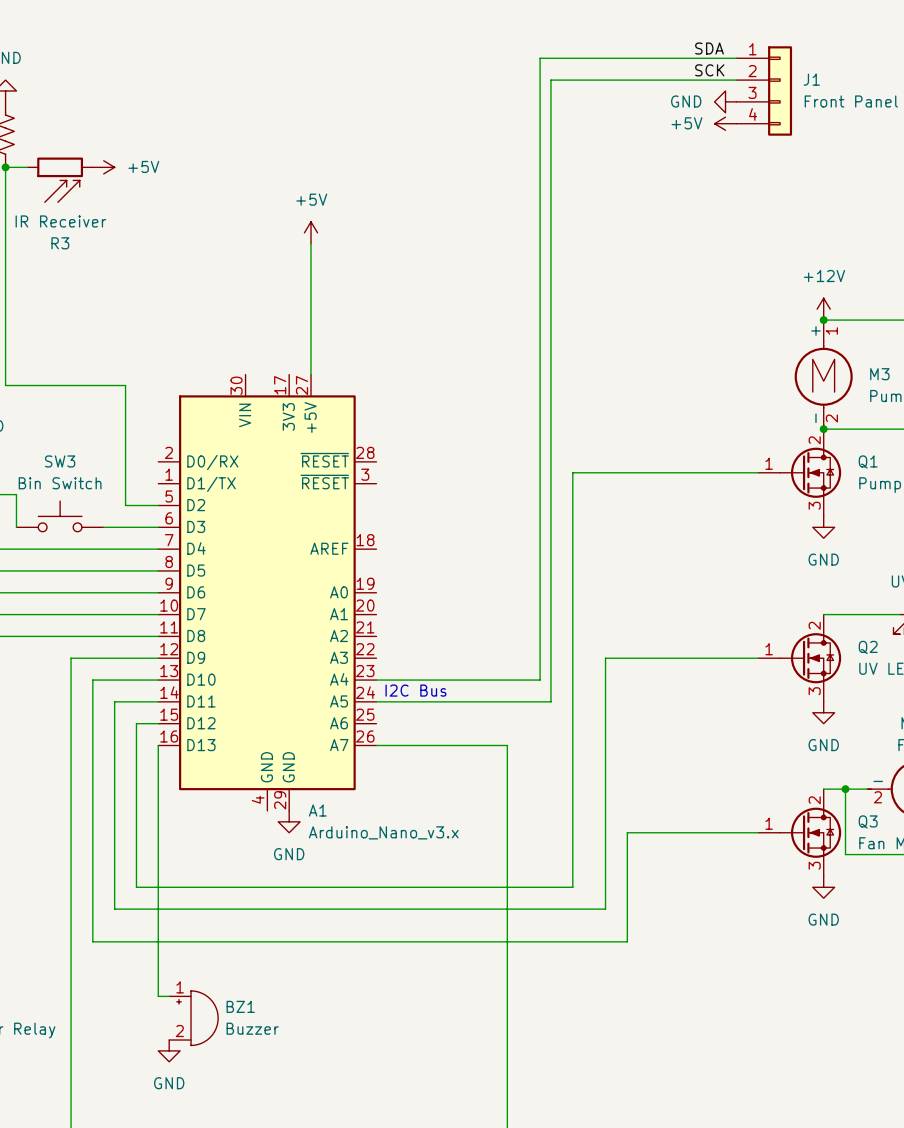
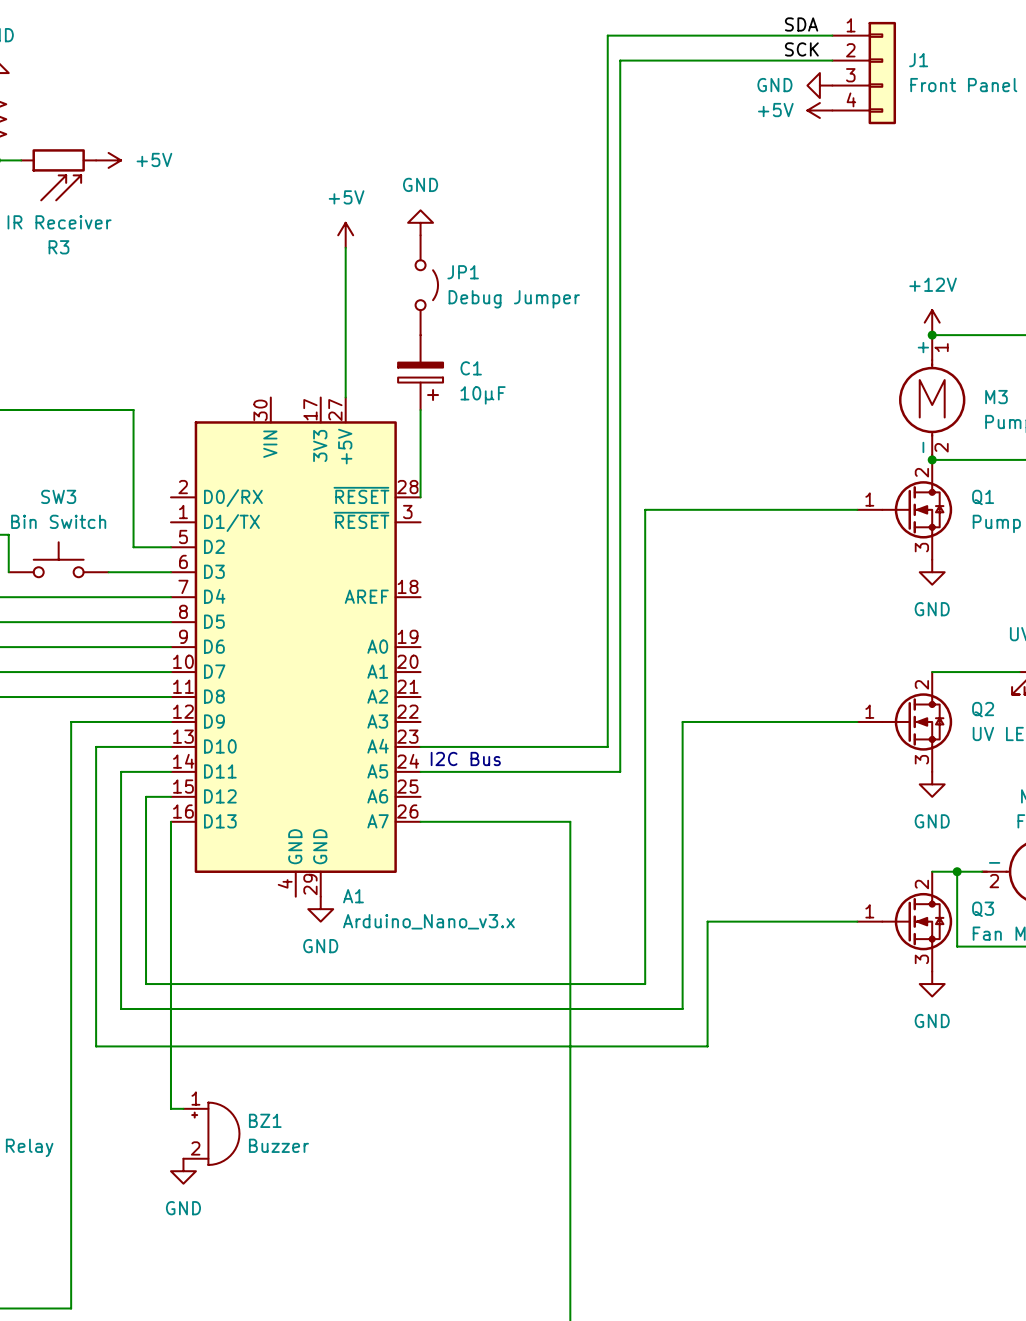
power symbol: none -> GND (420, 222)
JP1: none -> Debug Jumper (426, 285)
C1: none -> 10µF (420, 372)
wire: none -> (420, 410) (420, 497)

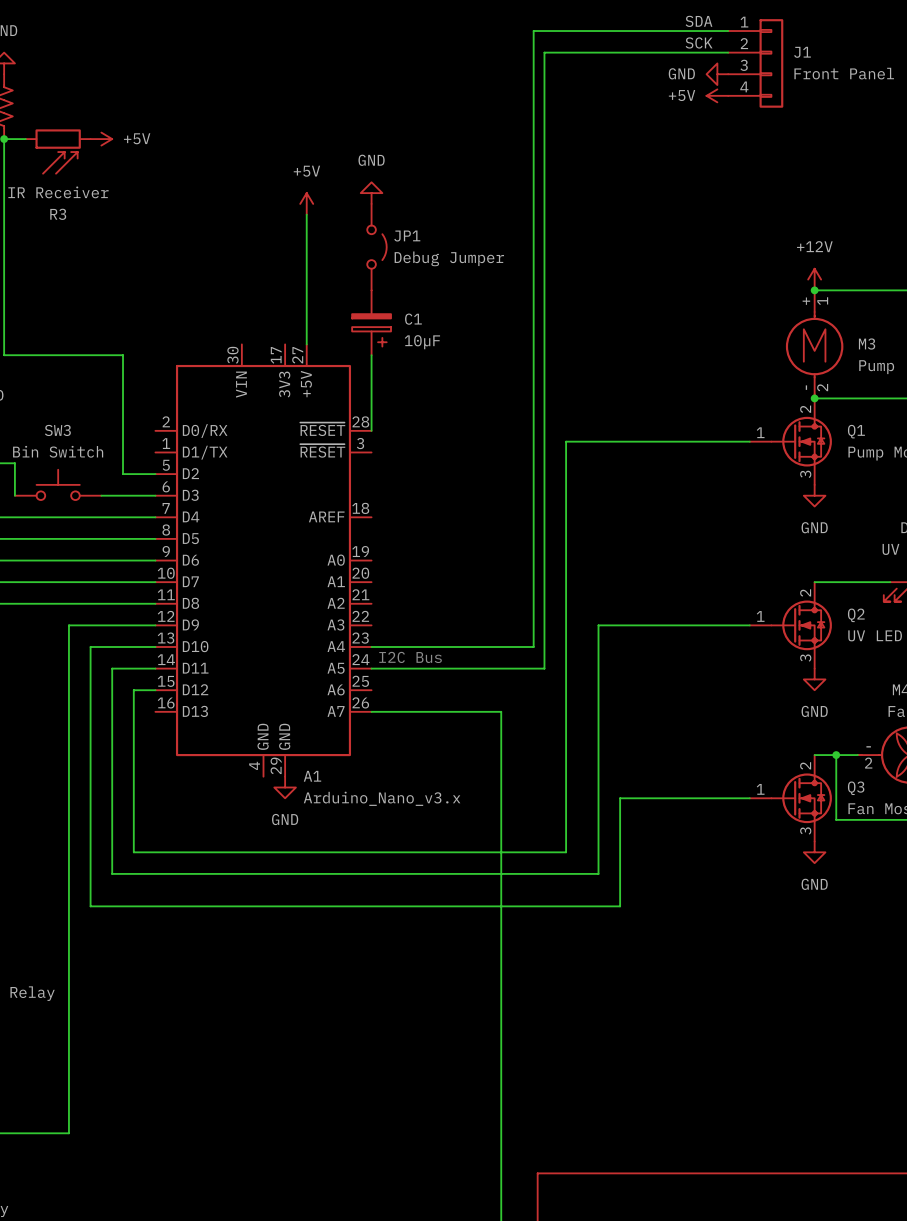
wire: (170, 821) (170, 1108) (183, 1108) -> none
BZ1: Buzzer (211, 1133) -> none
power symbol: GND (183, 1171) -> none

